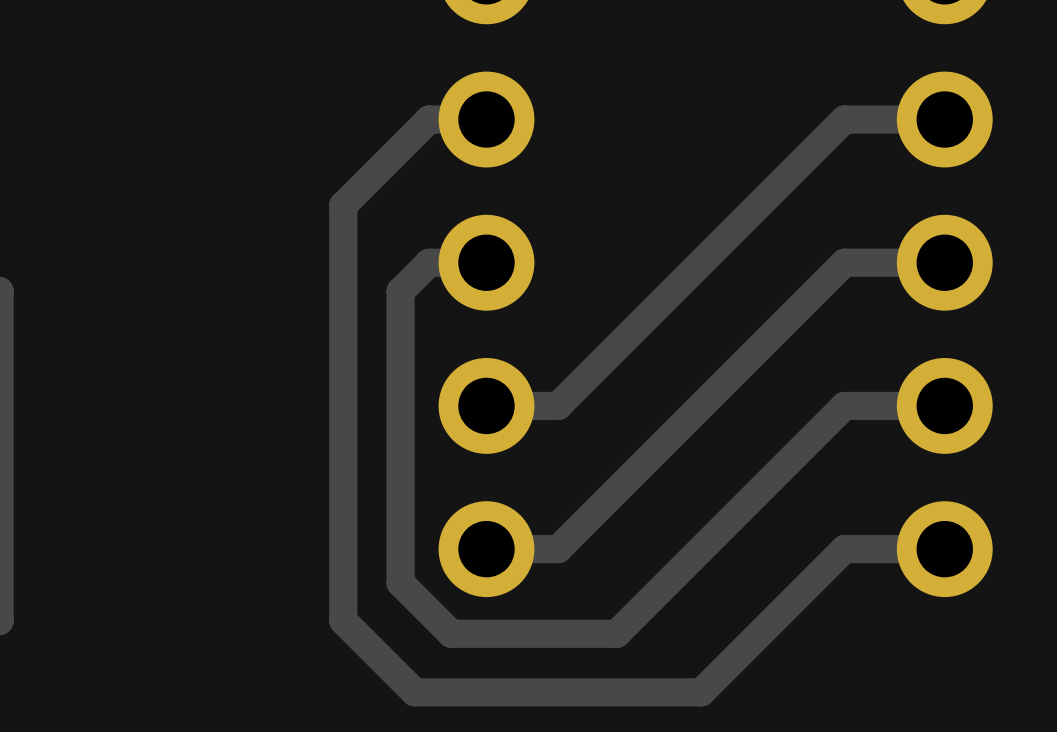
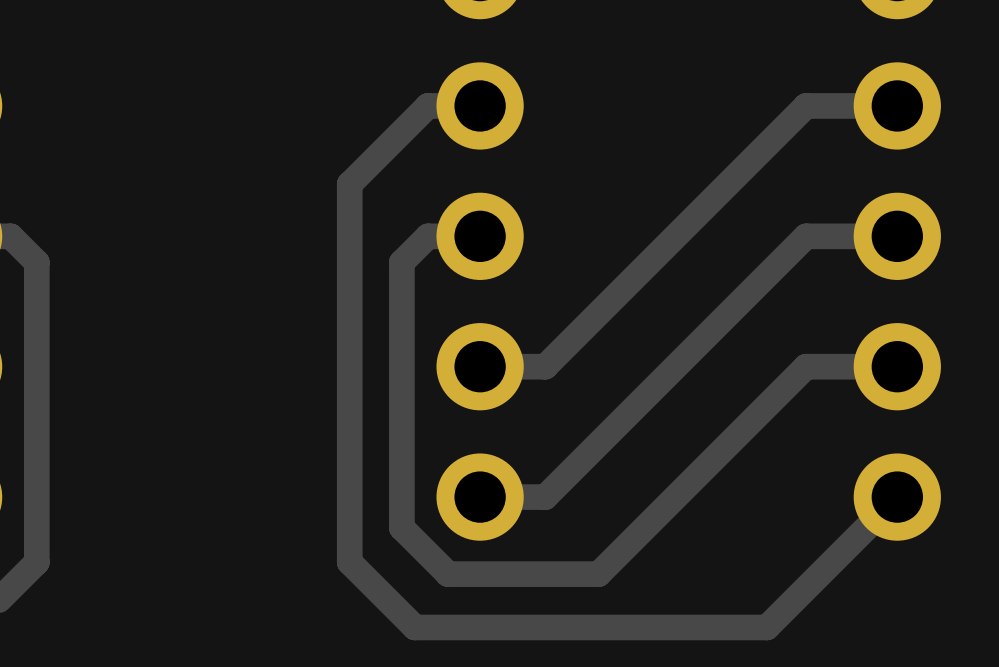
track: (944, 549) (844, 549) (701, 692) -> (897, 497) (766, 627) (675, 627)

